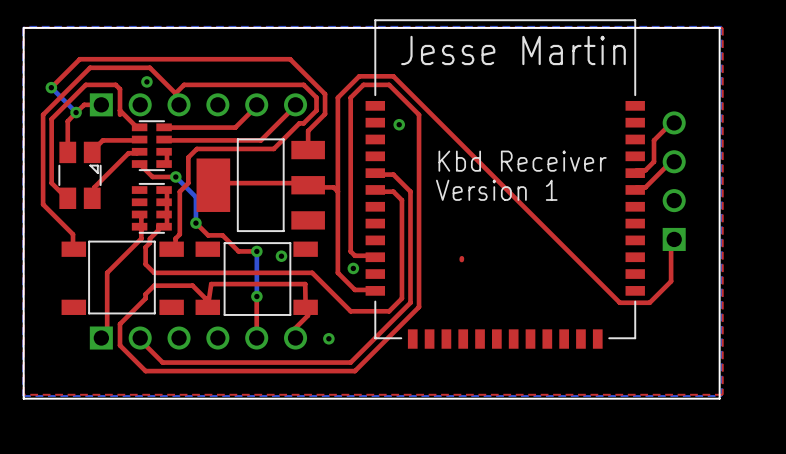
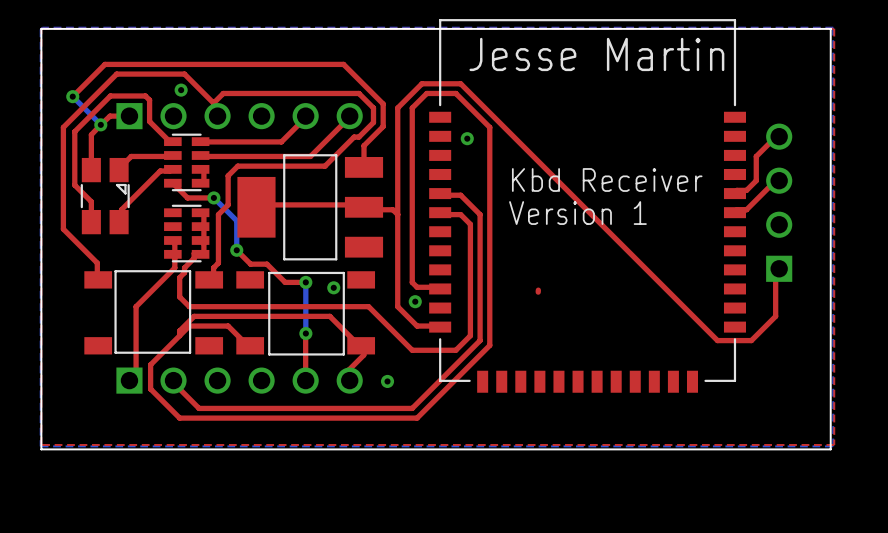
top track: (120, 114) (120, 89) (115, 84) (85, 84) (51, 119) (51, 183) (67, 198) -> (150, 122) (149, 100) (145, 96) (110, 96) (74, 131) (74, 185) (91, 201) (91, 222)
top track: (154, 285) (192, 285) (205, 298) (205, 307) -> (179, 335) (189, 326) (228, 326) (247, 345)
top track: (207, 307) (211, 284) (305, 284) (305, 307) -> (189, 321) (194, 316) (329, 316) (361, 345)

